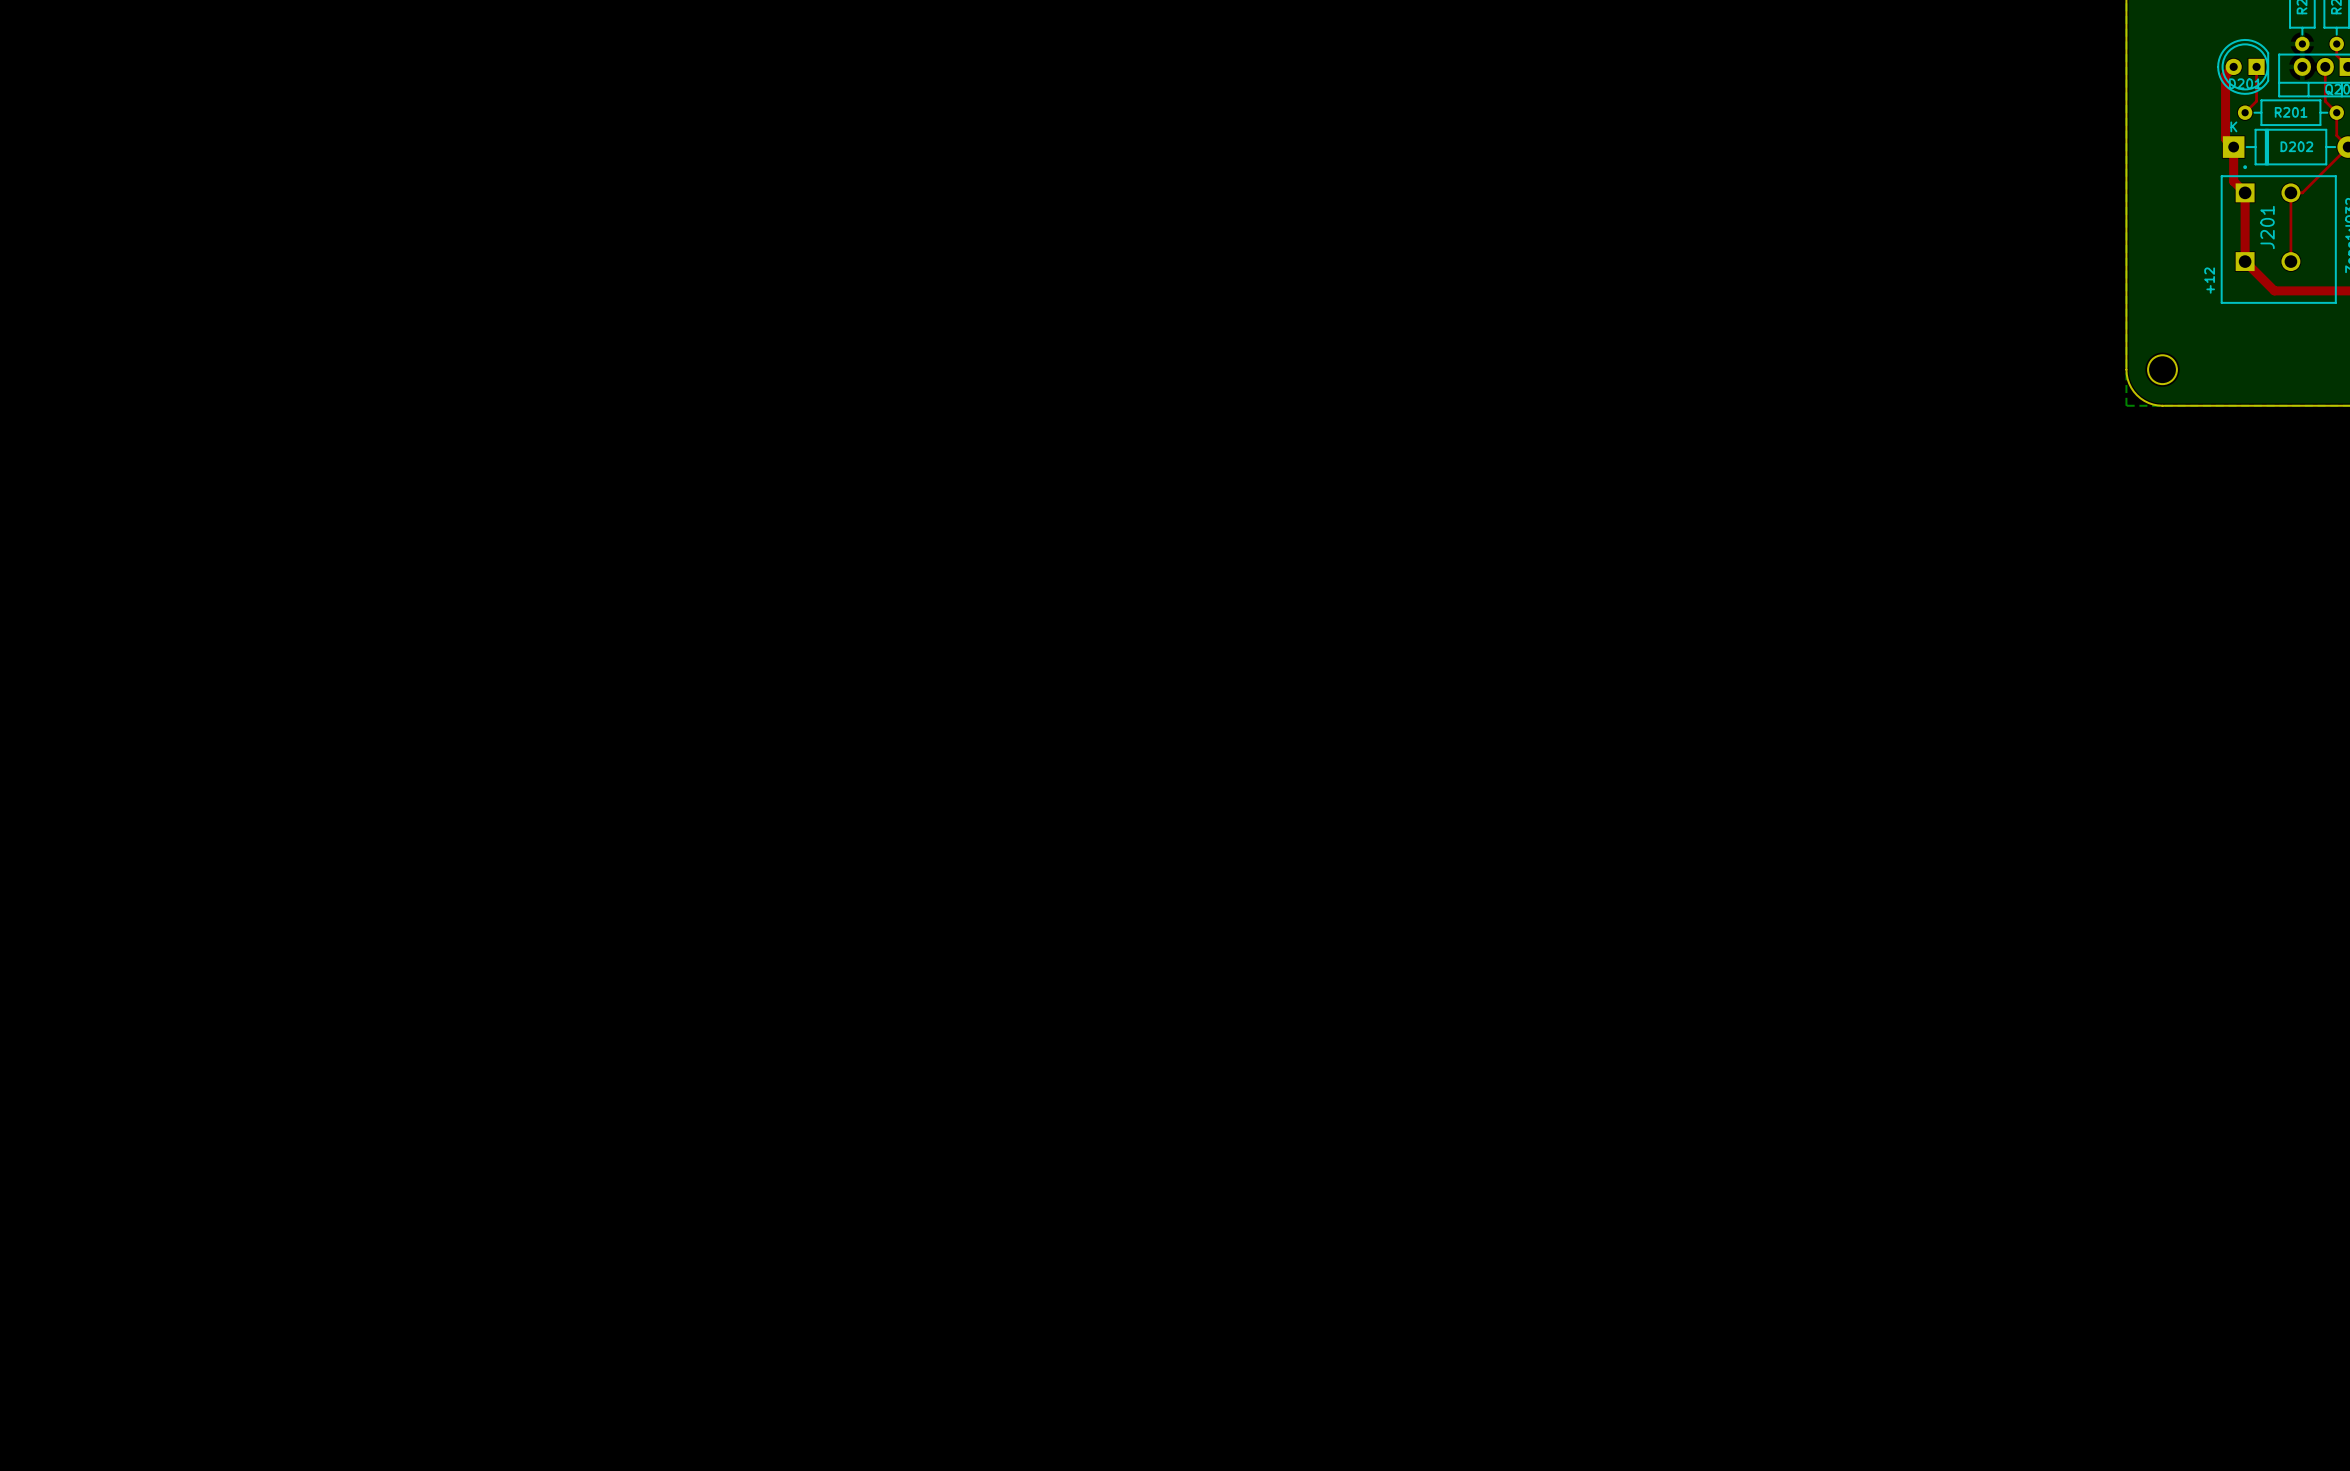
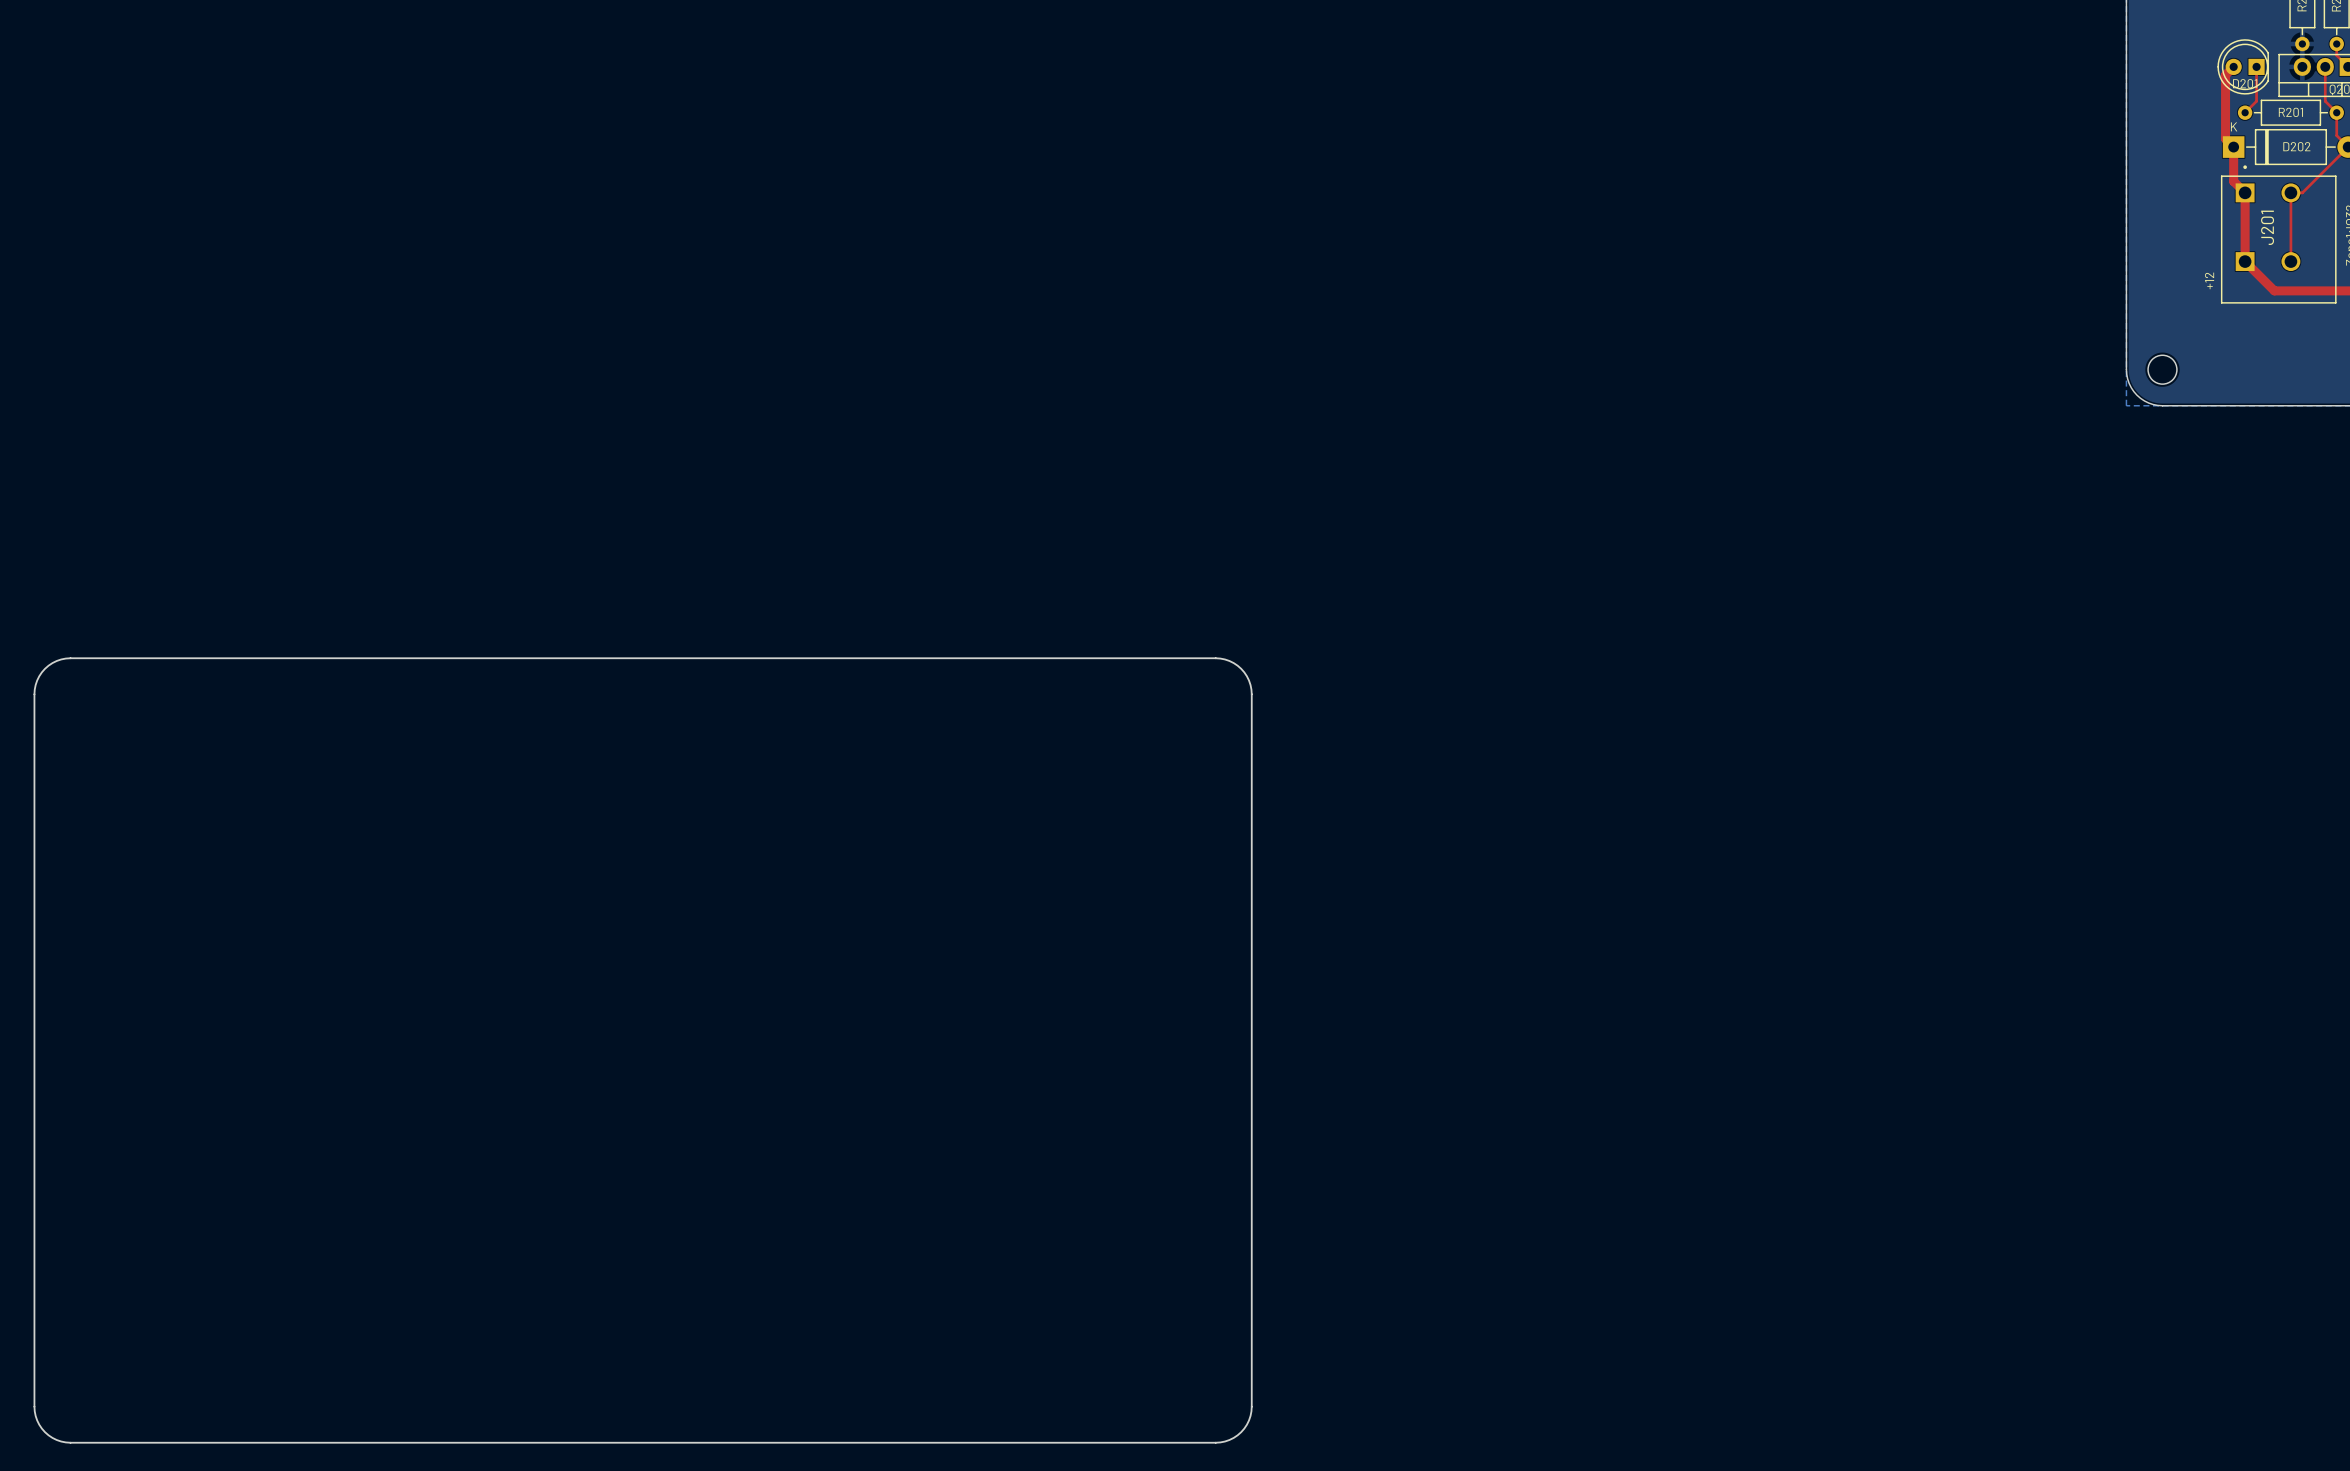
board edge: none -> (70, 658) (1215, 658) (1233, 663) (1246, 676) (1251, 694) (1251, 1406) (1246, 1424) (1233, 1437) (1215, 1442) (70, 1442) (52, 1437) (39, 1424) (34, 1406) (34, 694) (37, 680) (45, 668) (56, 660) (70, 658)

